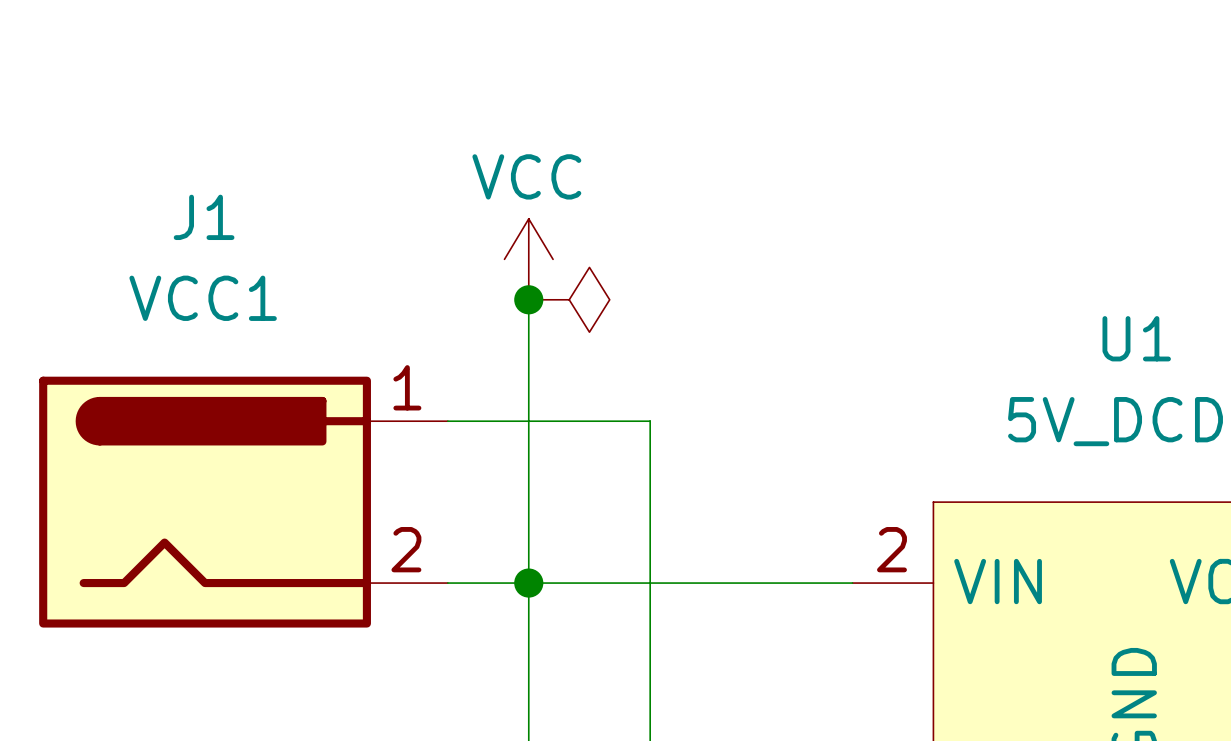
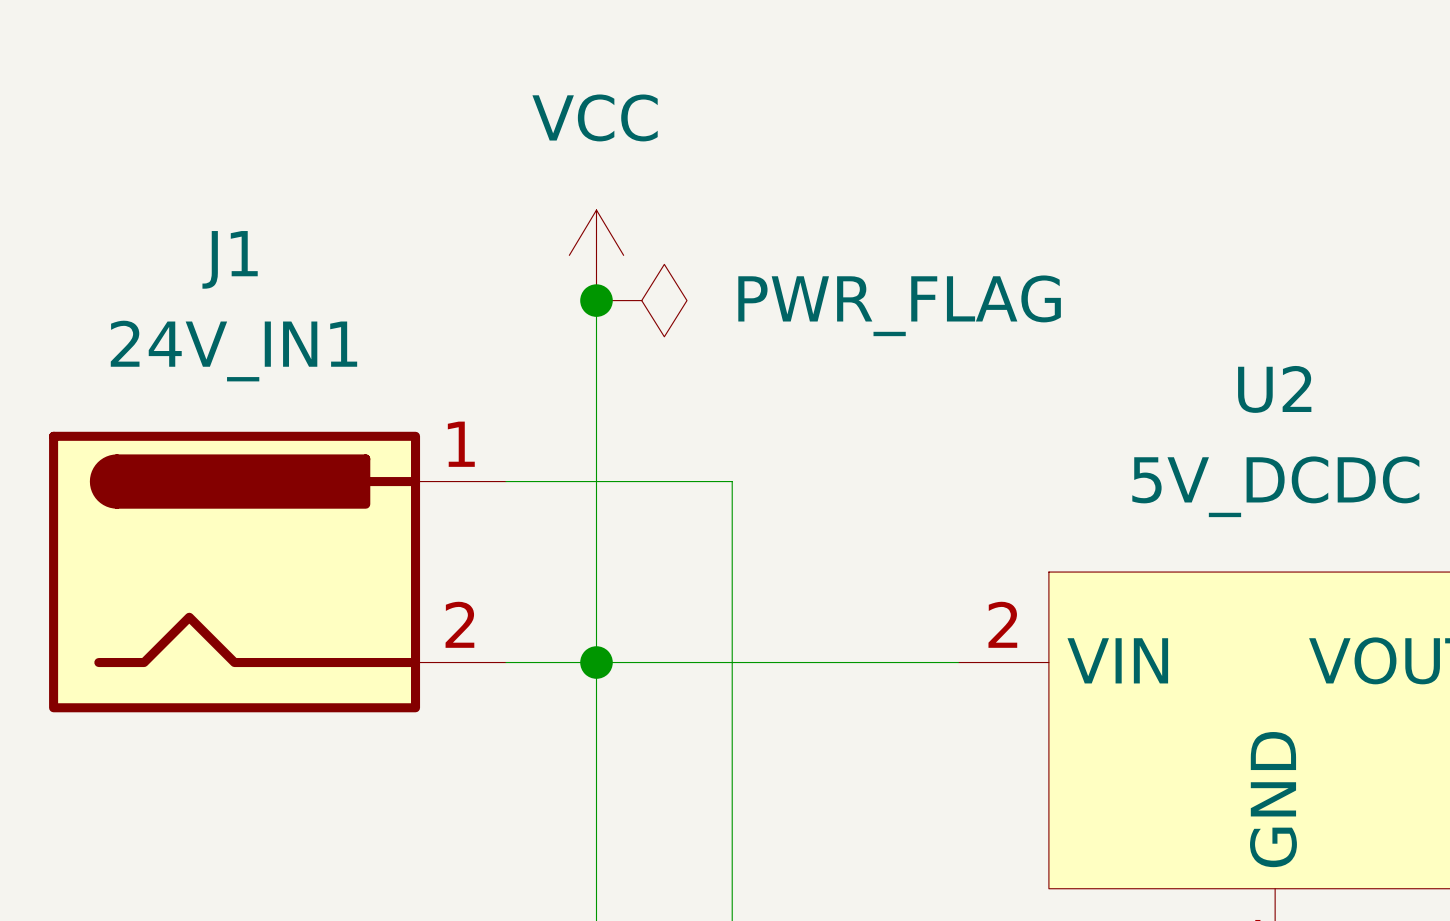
power symbol text position: VCC (526, 176) -> VCC (595, 117)
power symbol position: VCC (528, 259) -> VCC (596, 255)
power symbol: none -> PWR_FLAG (641, 300)
J1 value: VCC1 (203, 298) -> 24V_IN1 (233, 351)
junction position: (528, 299) -> (596, 300)
power symbol: (569, 299) -> none
U1 name: U1 (1136, 338) -> U2 (1274, 389)

